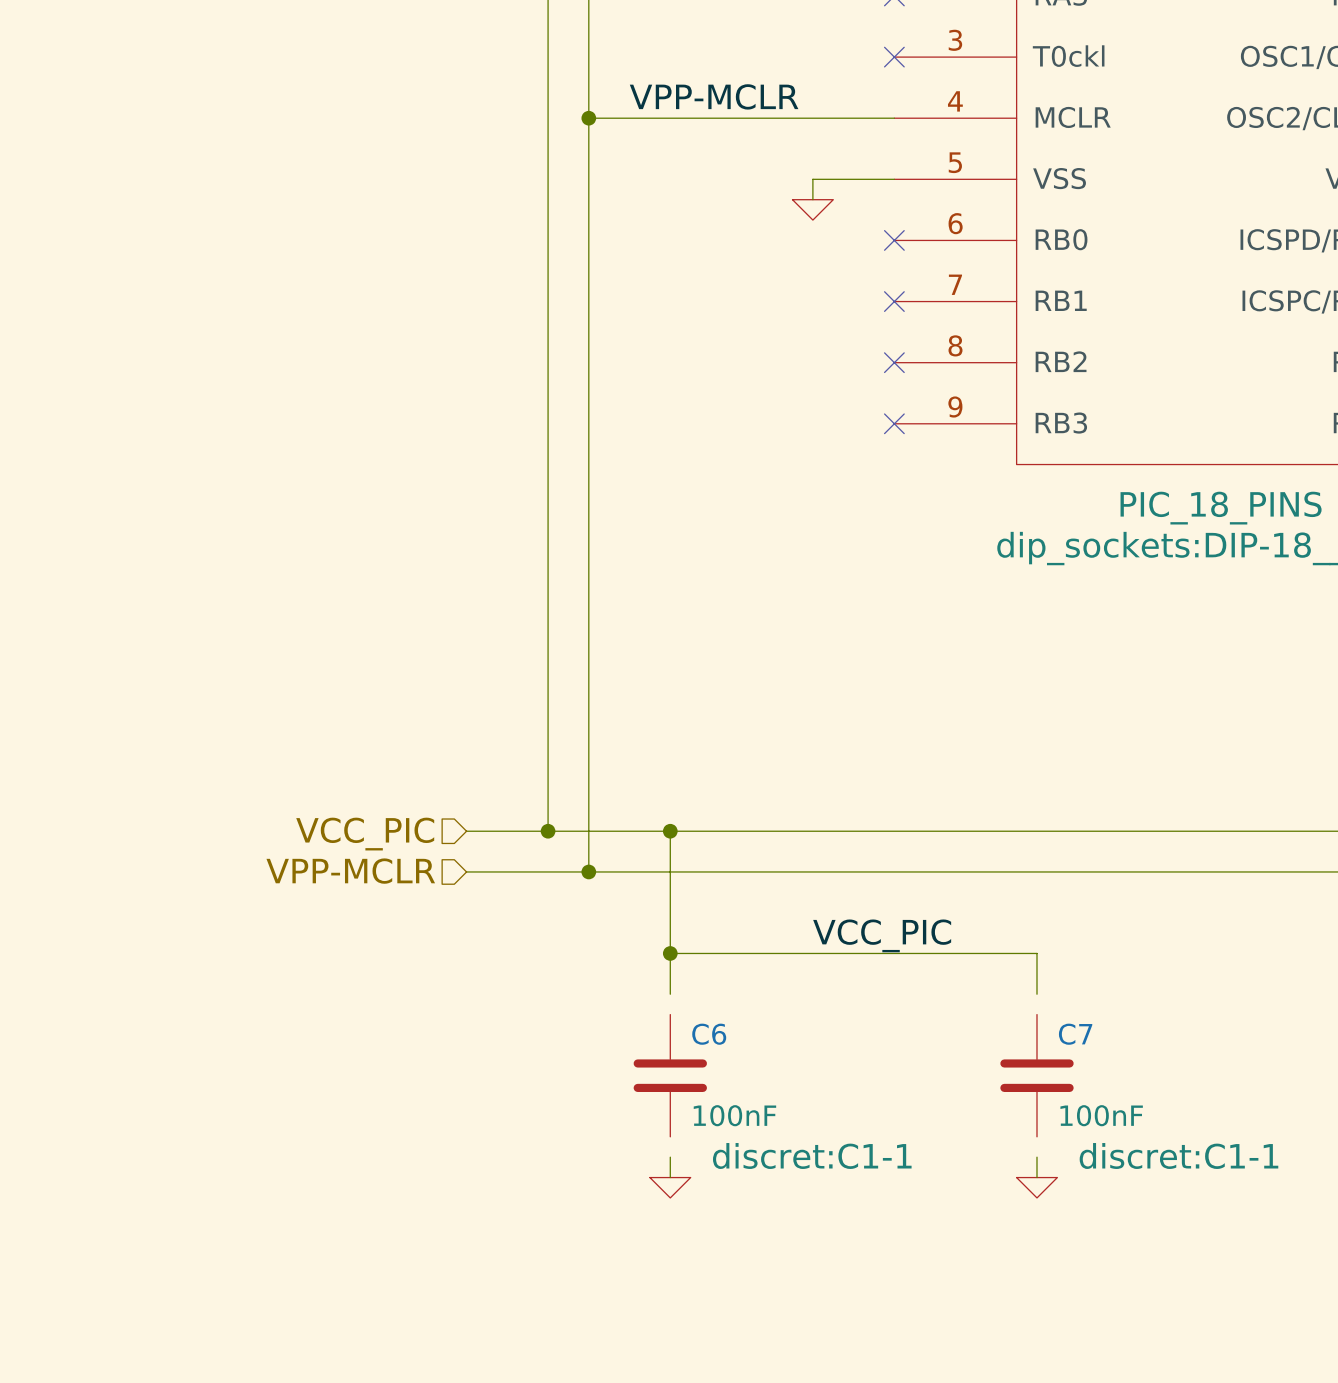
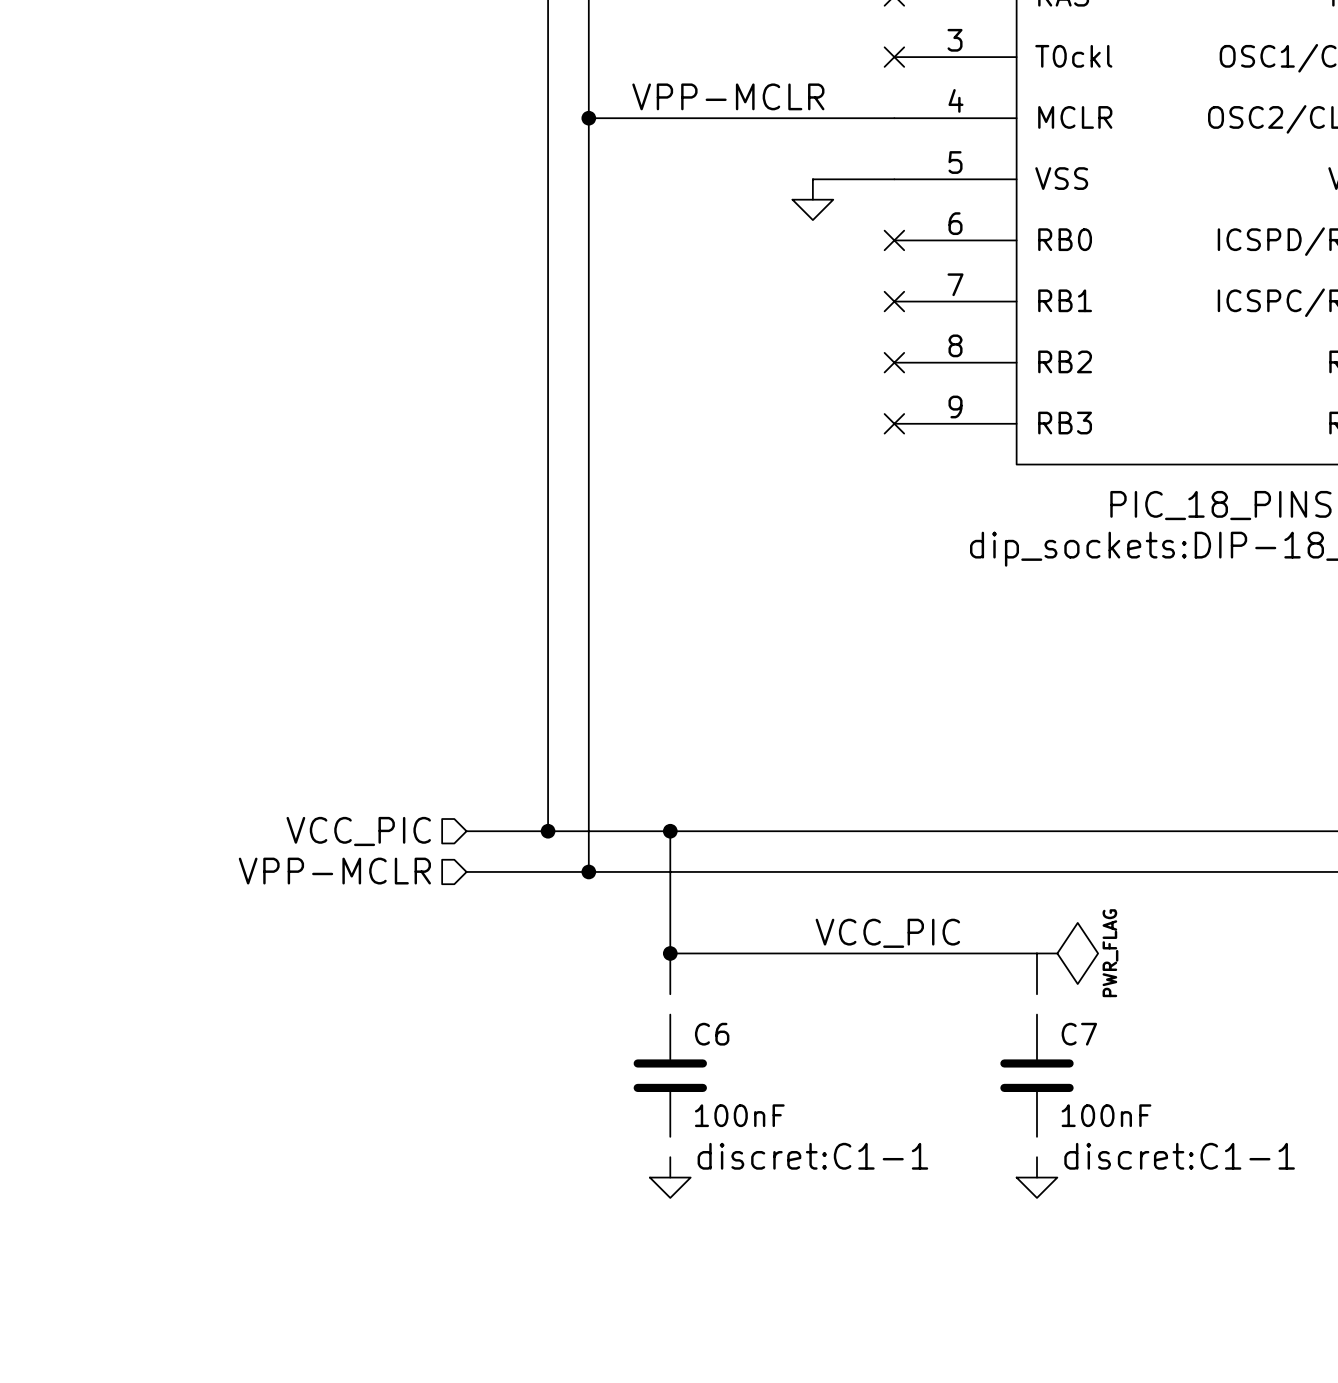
power symbol: none -> PWR_FLAG (1067, 953)

